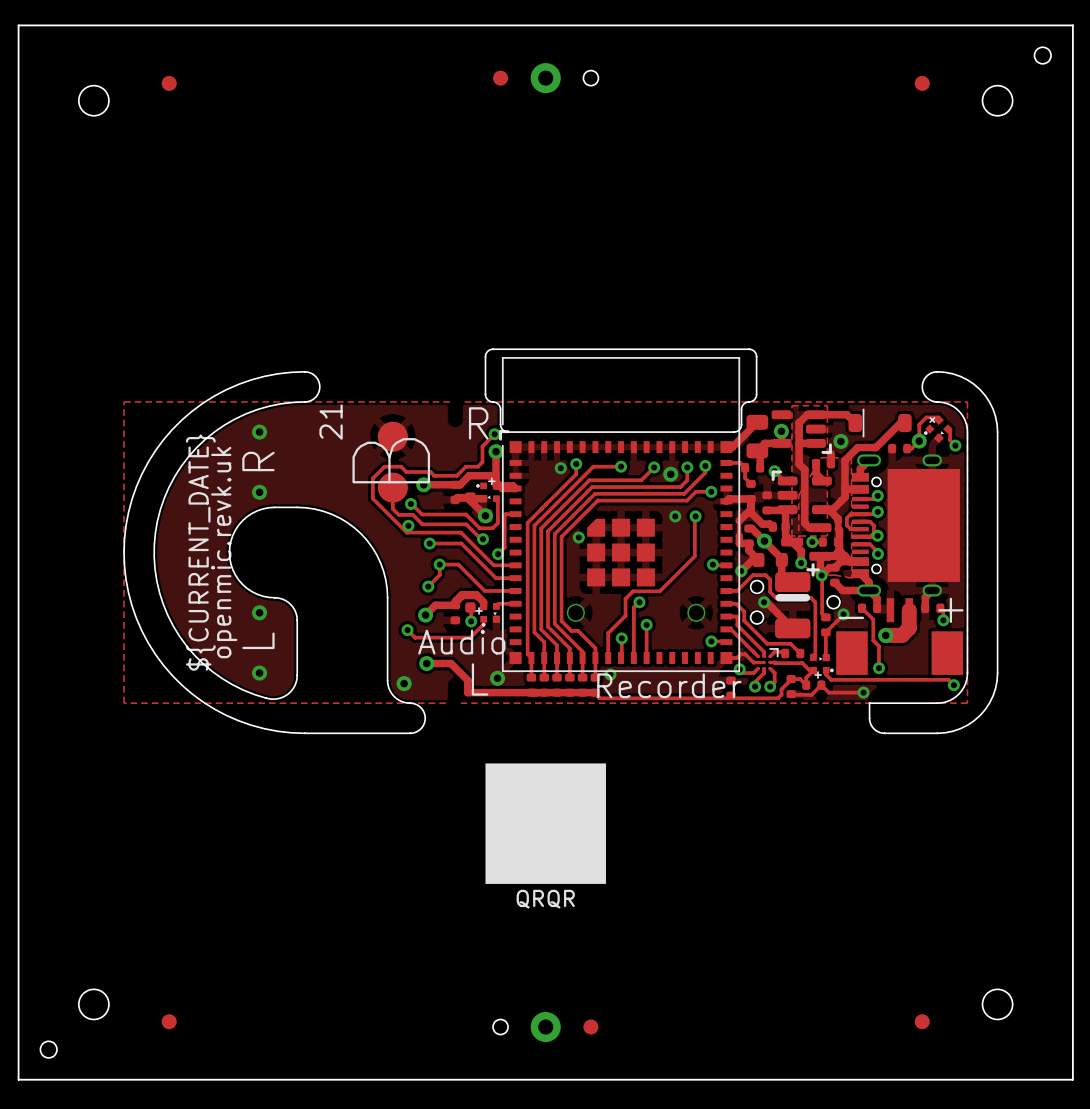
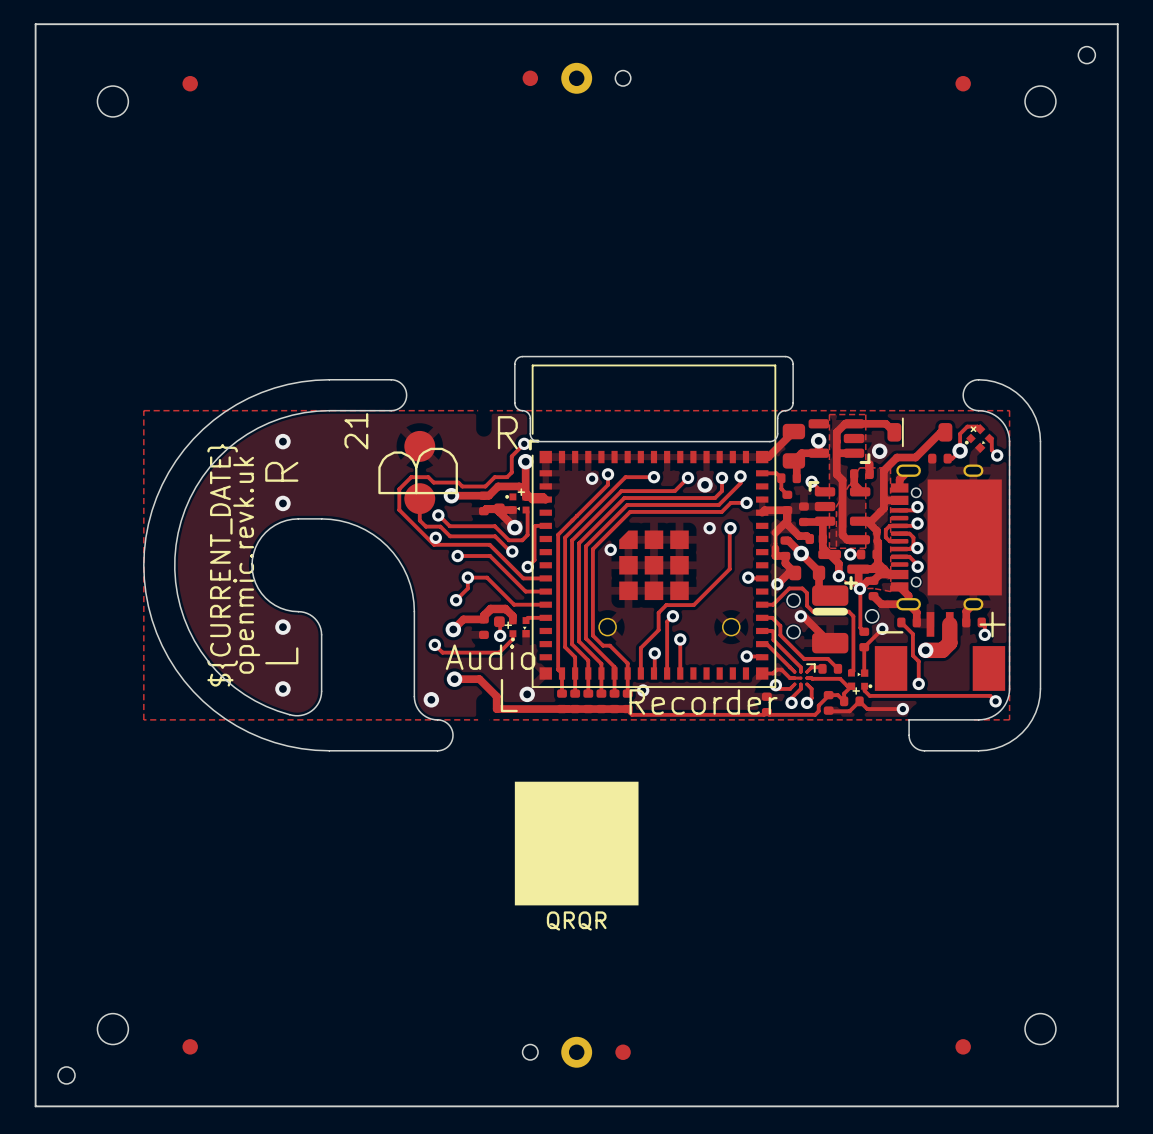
board edge: (304, 371) (315, 376) (319, 386) (315, 397) (304, 401) -> (329, 379) (395, 380) (403, 385) (406, 395) (403, 404) (395, 410) (329, 410)

